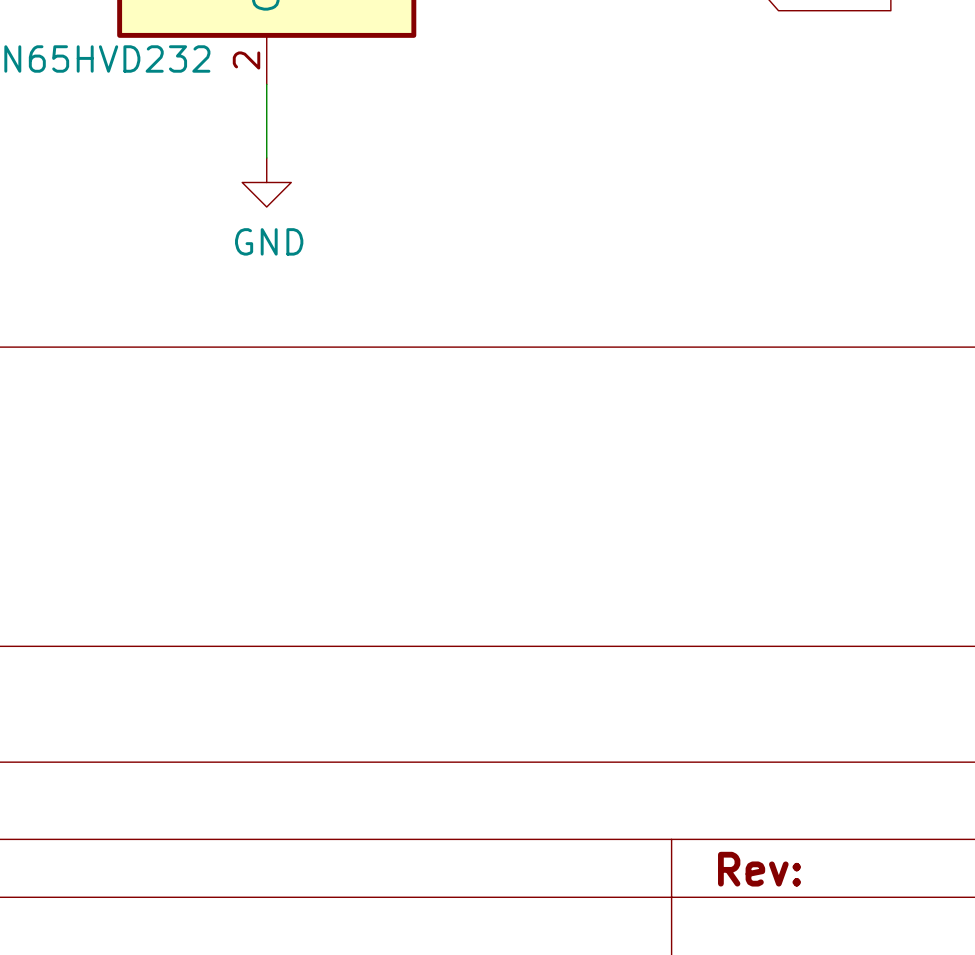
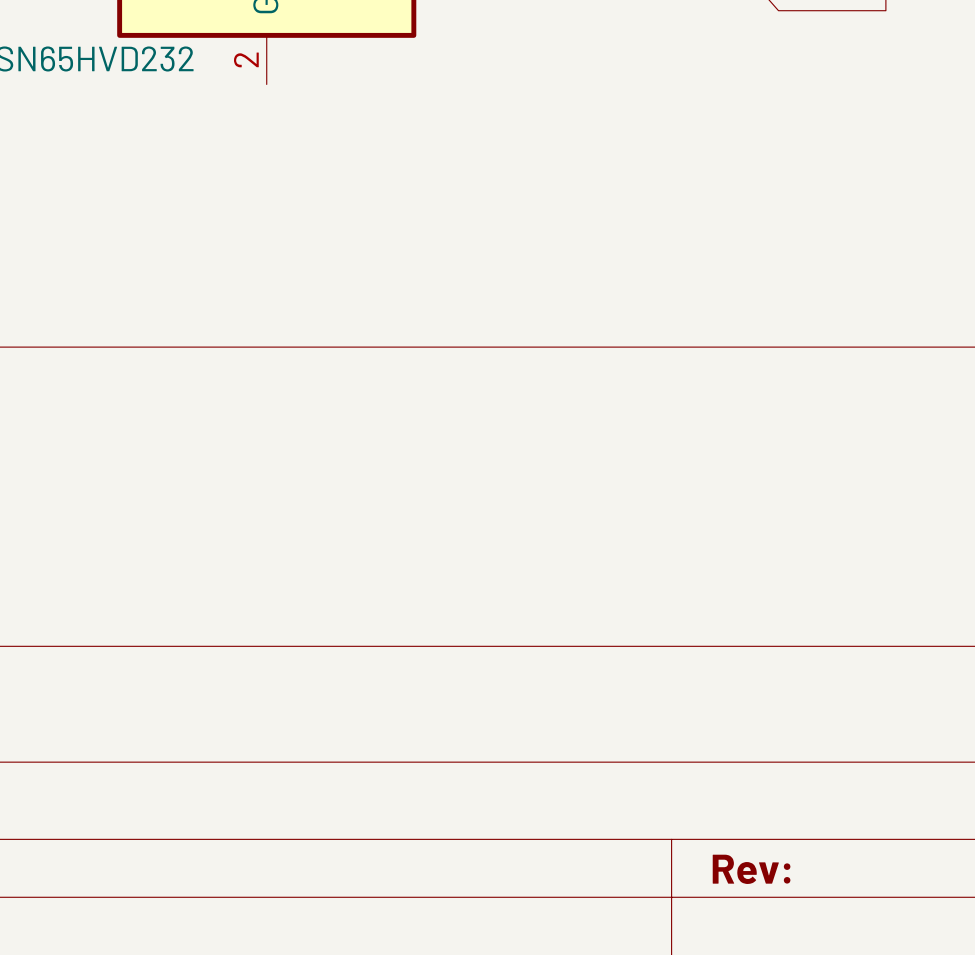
wire: (266, 84) (266, 157) -> none
power symbol: GND (266, 182) -> none

